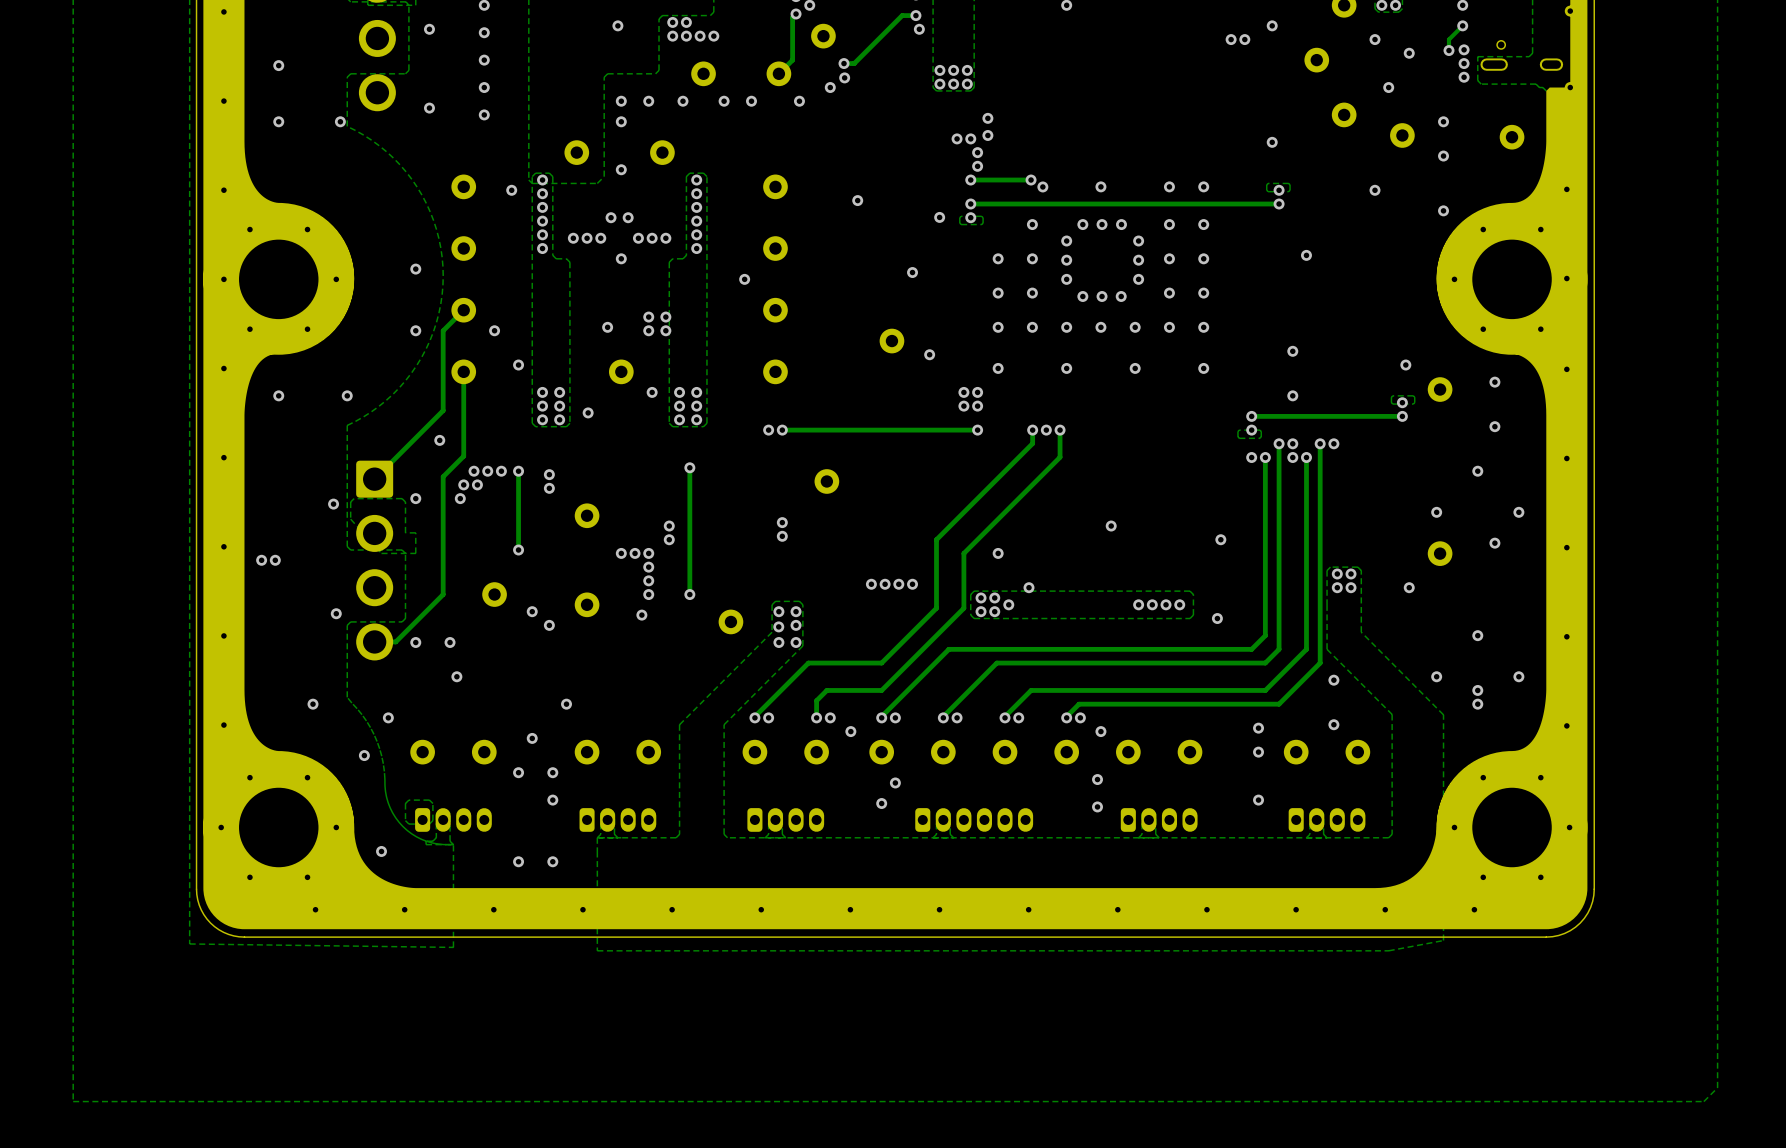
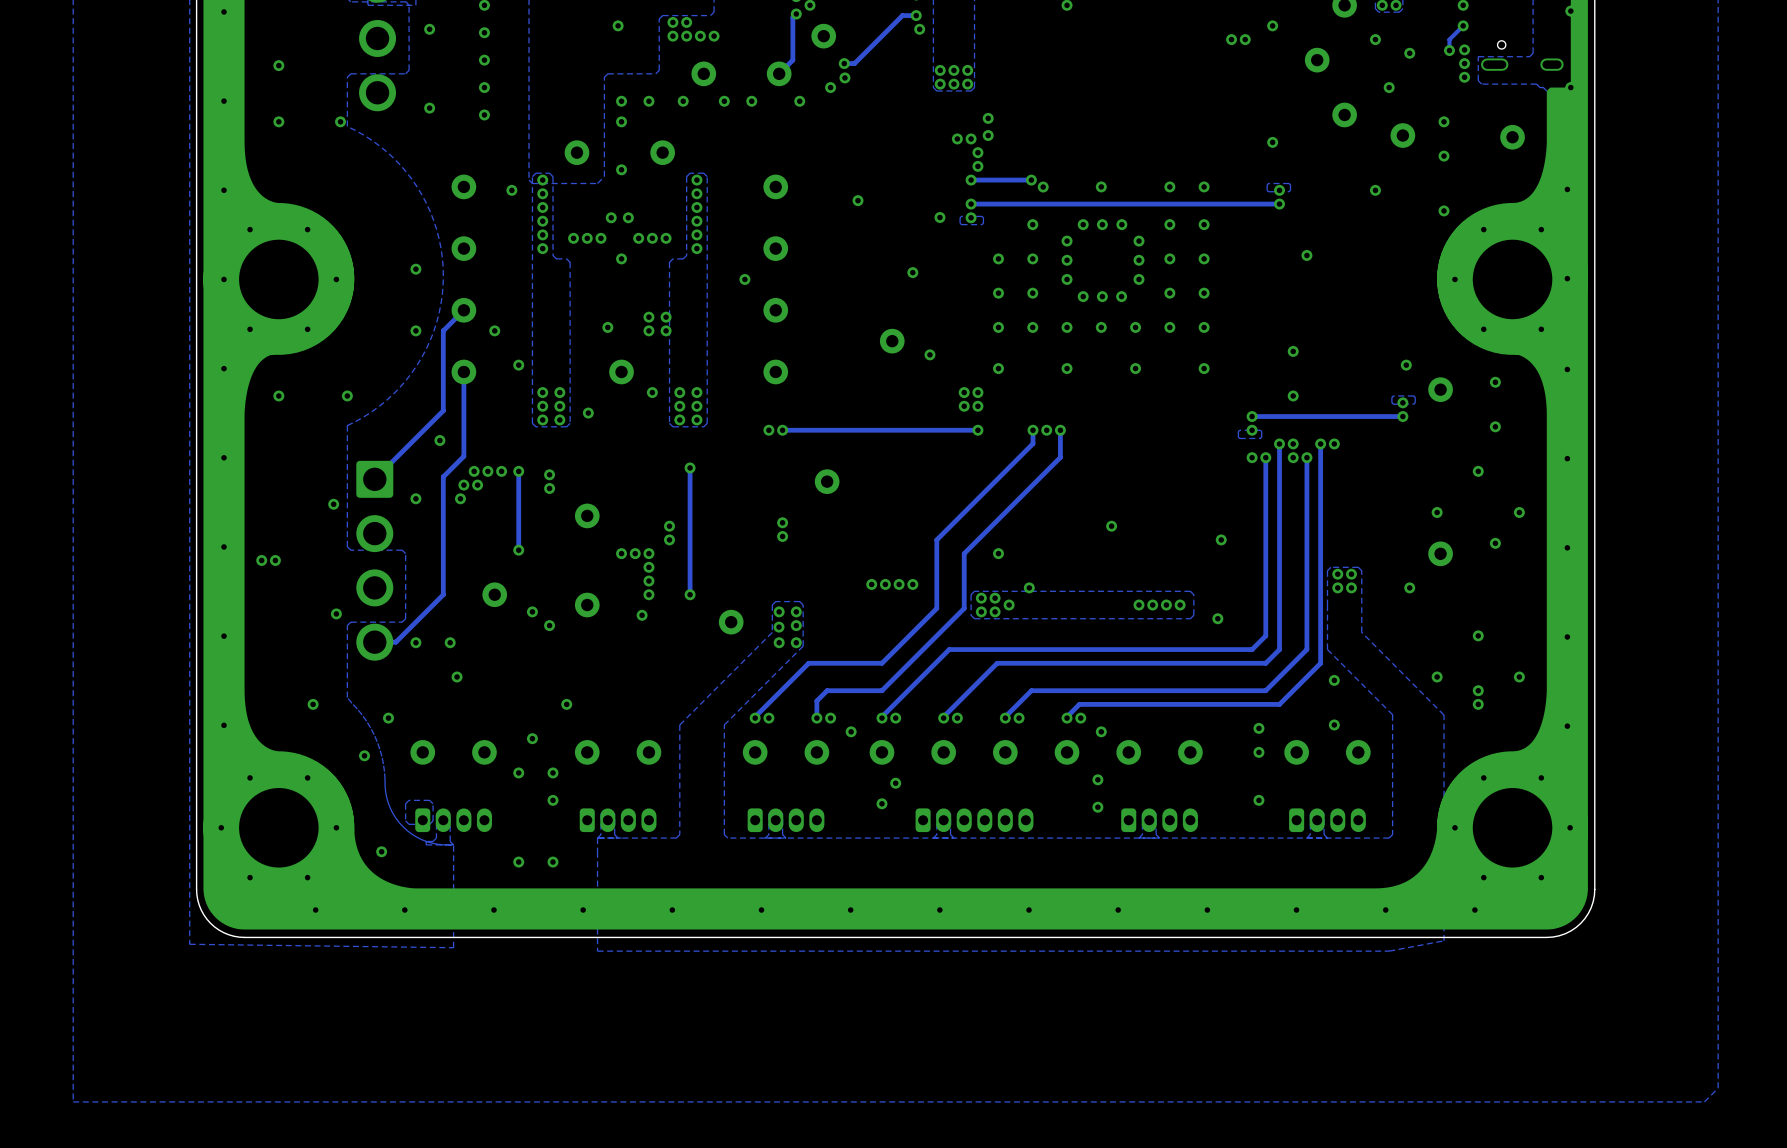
zone outline: (402, 498) (405, 502) (405, 532) (415, 532) (415, 553) (381, 553) (350, 519) (350, 502) (354, 498) (402, 498) -> none

